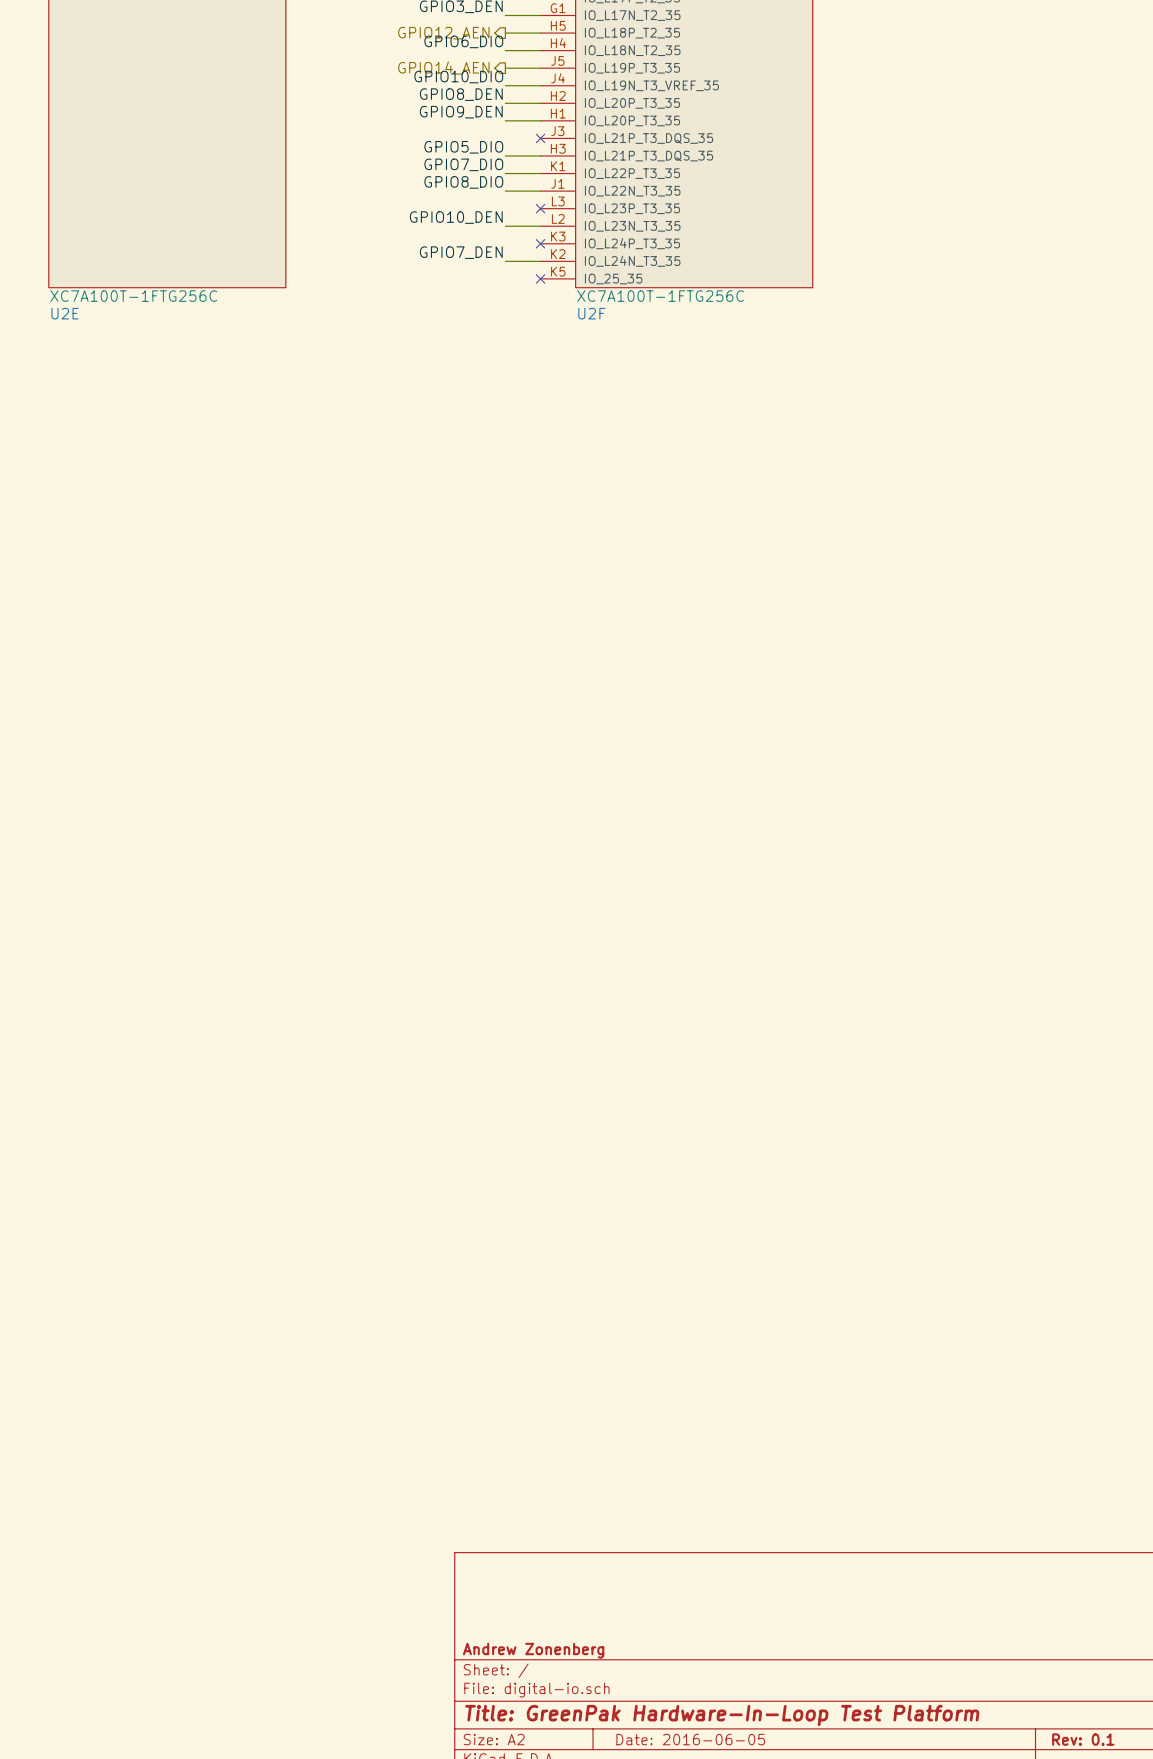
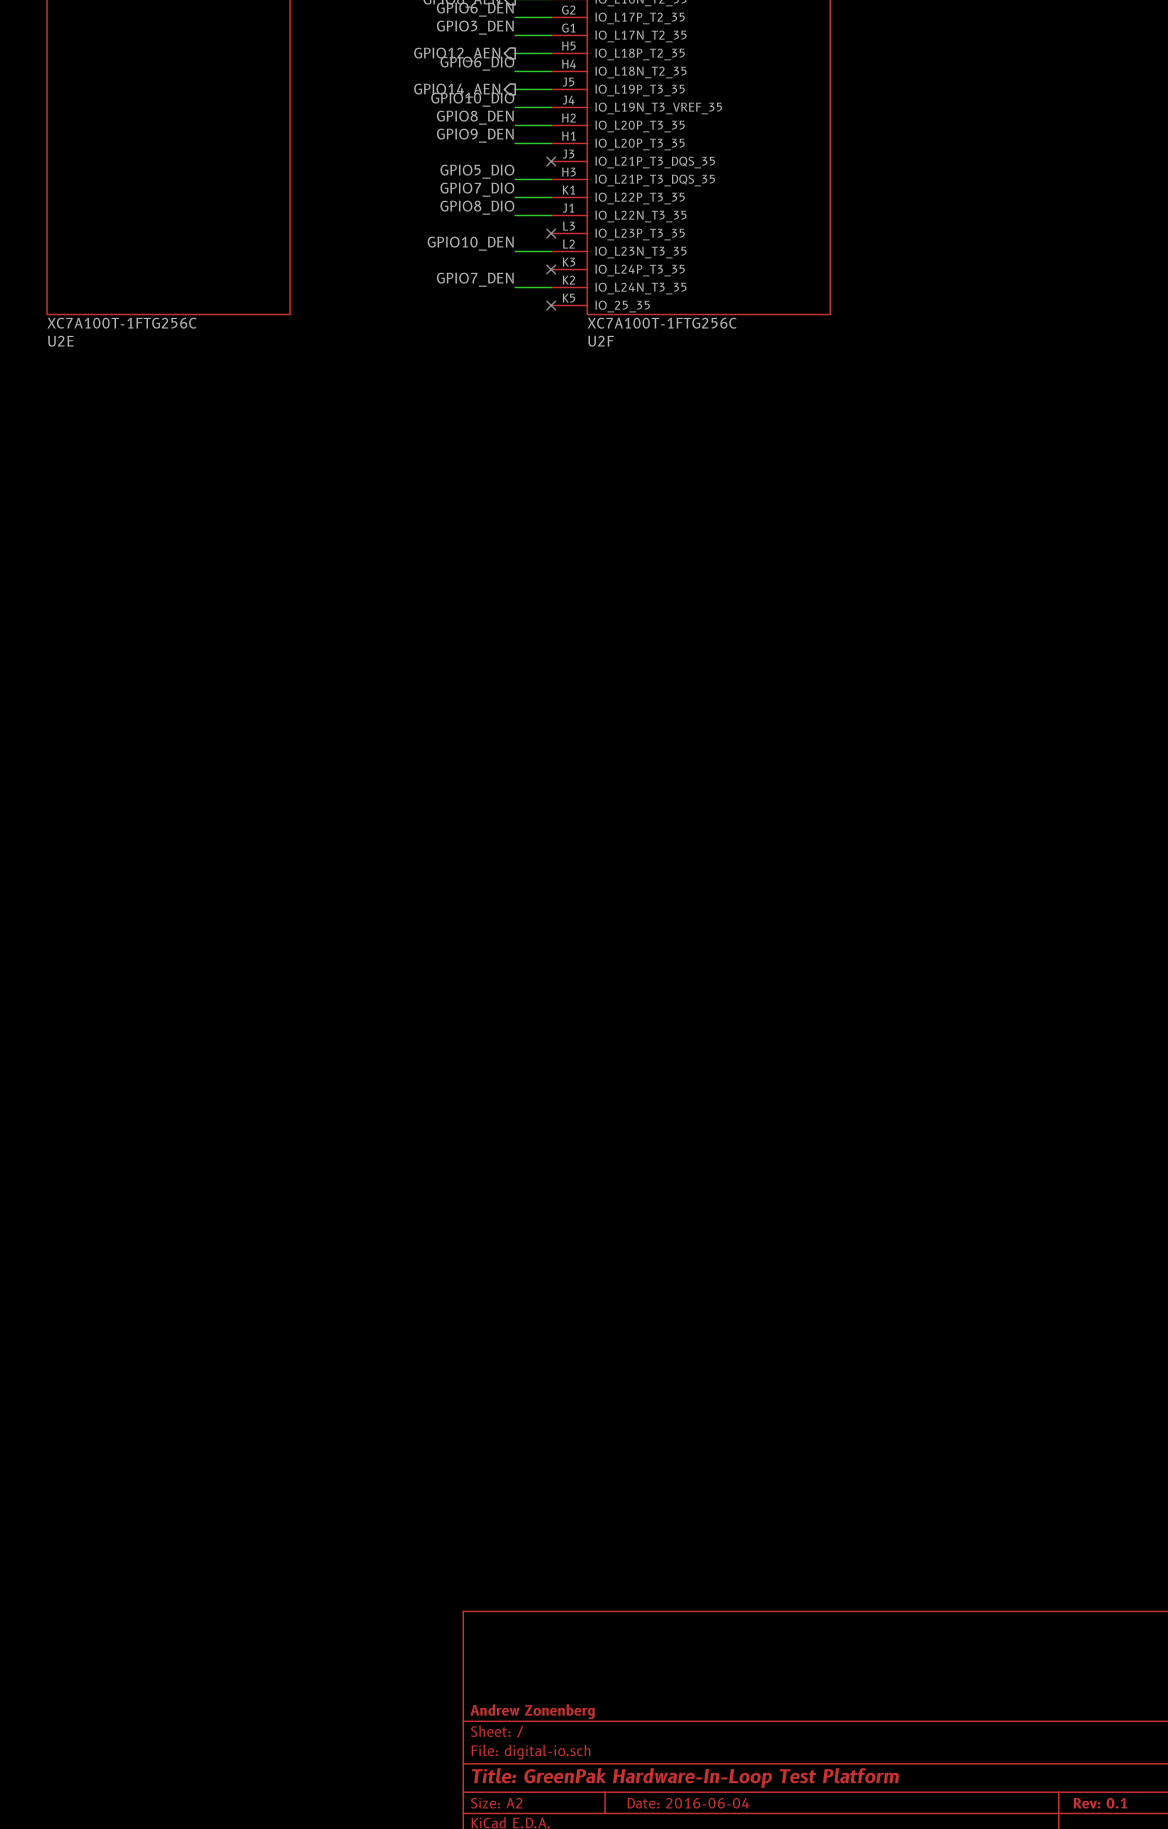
title block: Date: 2016-06-05 (690, 1739) -> Date: 2016-06-04 (688, 1803)

